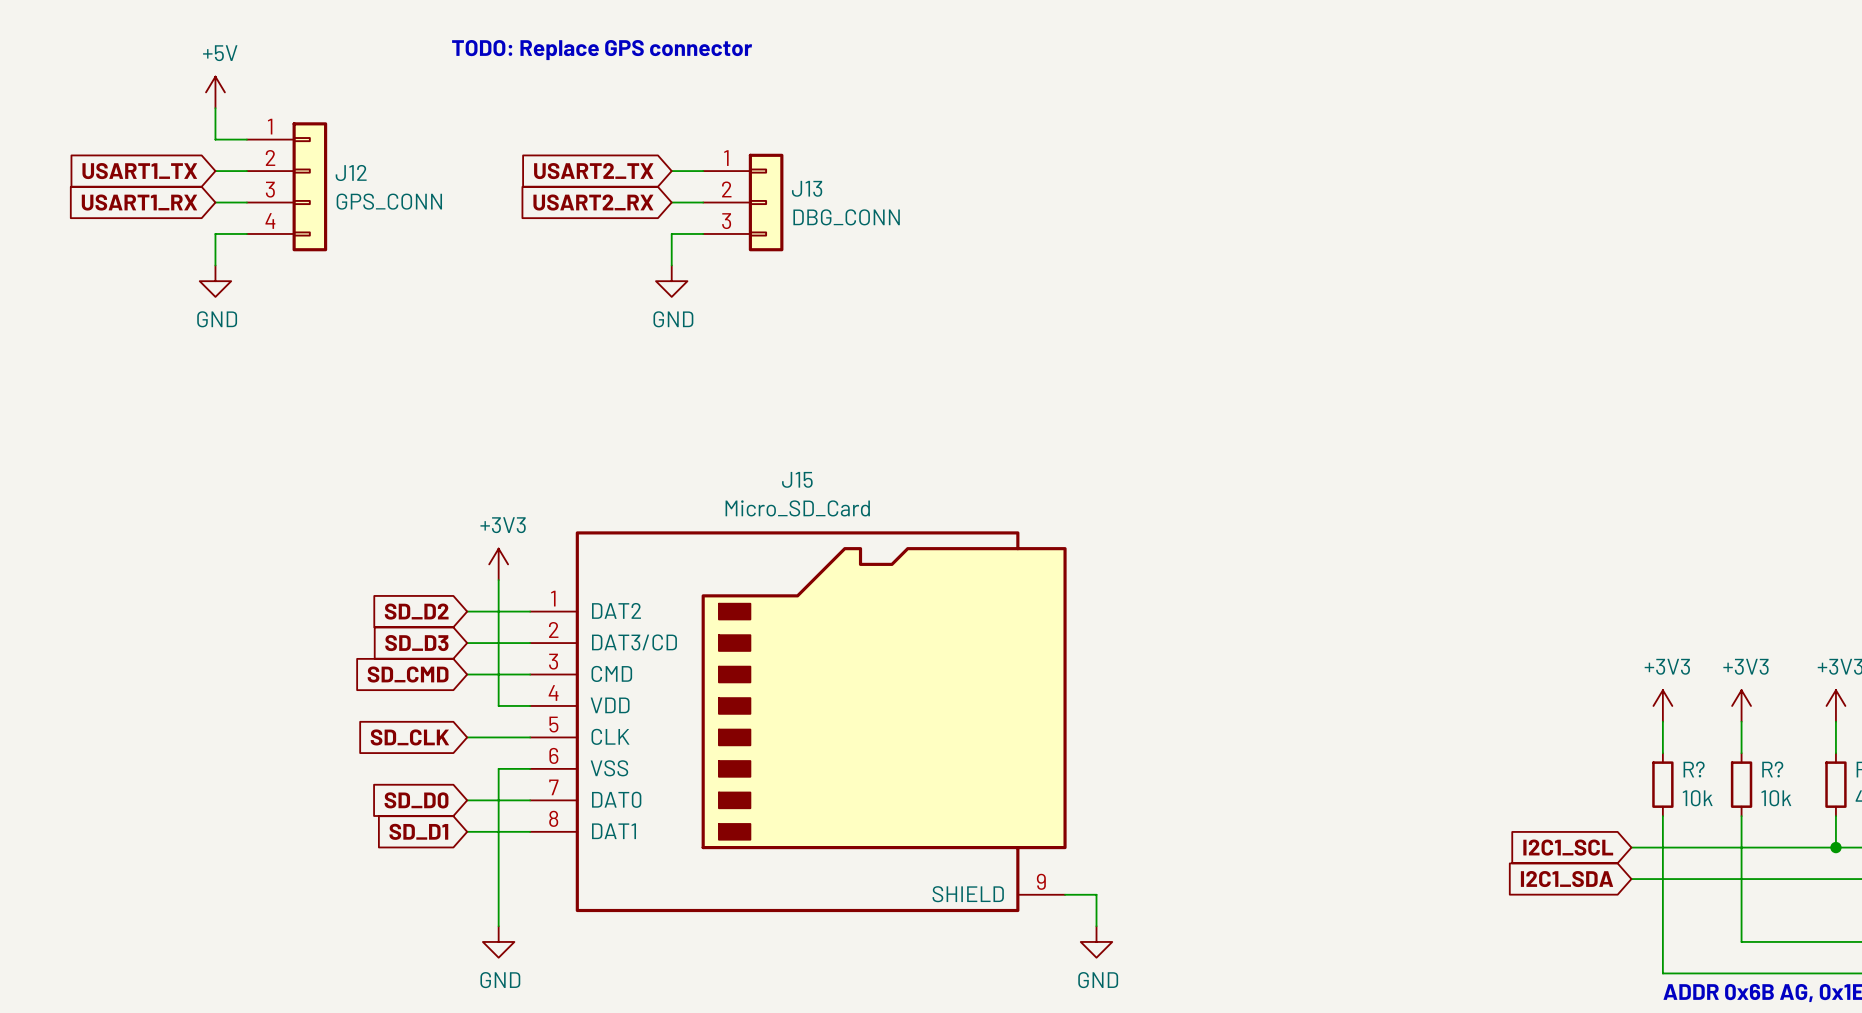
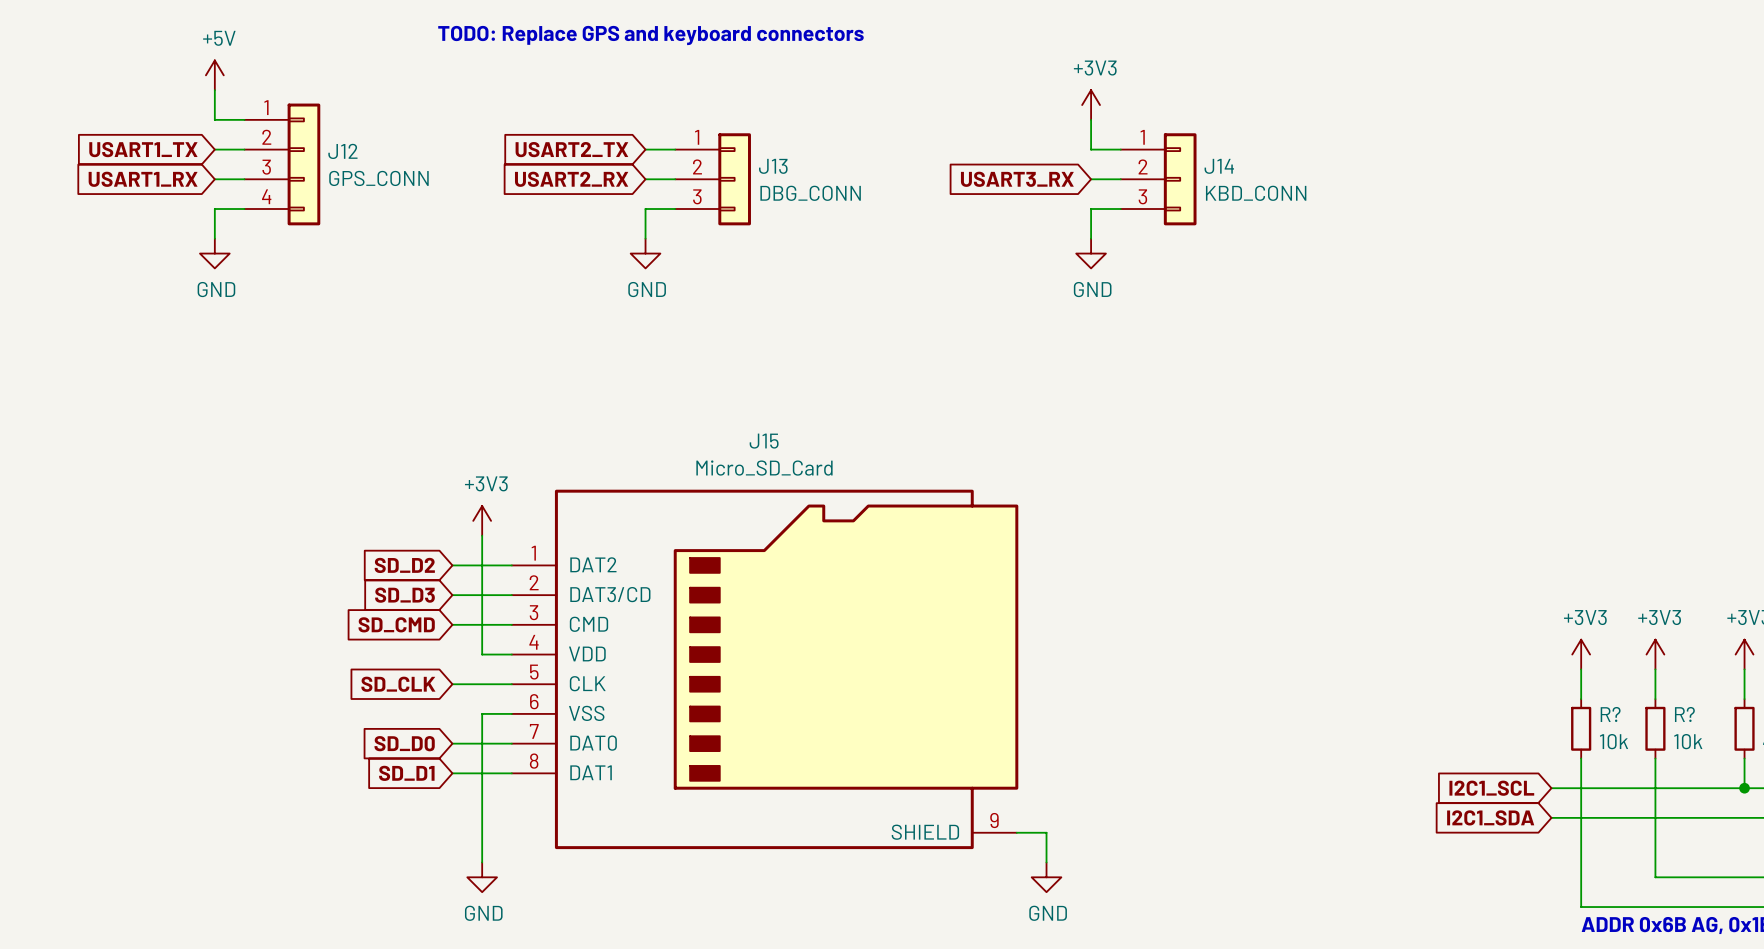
text: TODO: Replace GPS connector (602, 50) -> TODO: Replace GPS and keyboard connectors (650, 35)
power symbol: none -> +3V3 (1091, 105)
wire: none -> (1091, 119) (1091, 149) (1120, 149)
global label: none -> USART3_RX (1017, 179)
wire: none -> (1091, 179) (1120, 179)
J14: none -> KBD_CONN (1158, 179)
wire: none -> (1120, 209) (1091, 209) (1091, 238)
power symbol: none -> GND (1091, 253)

